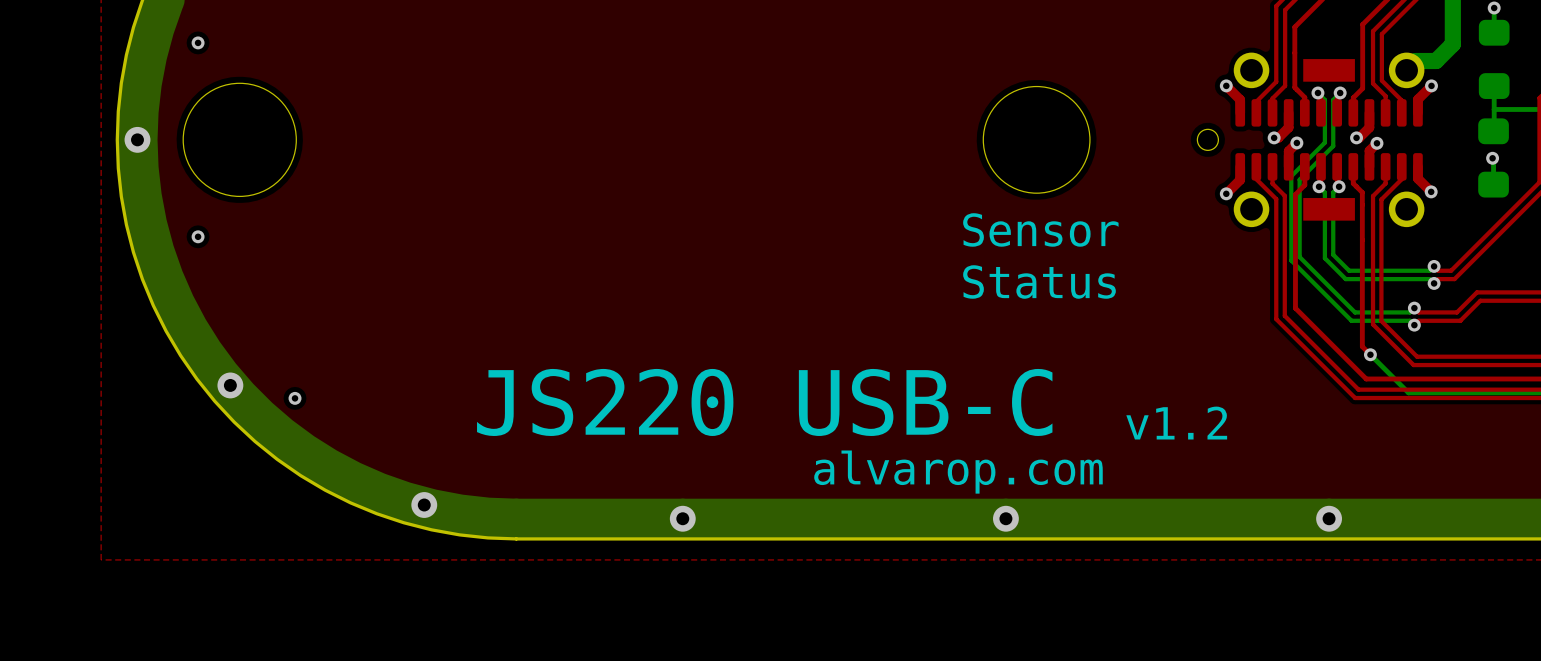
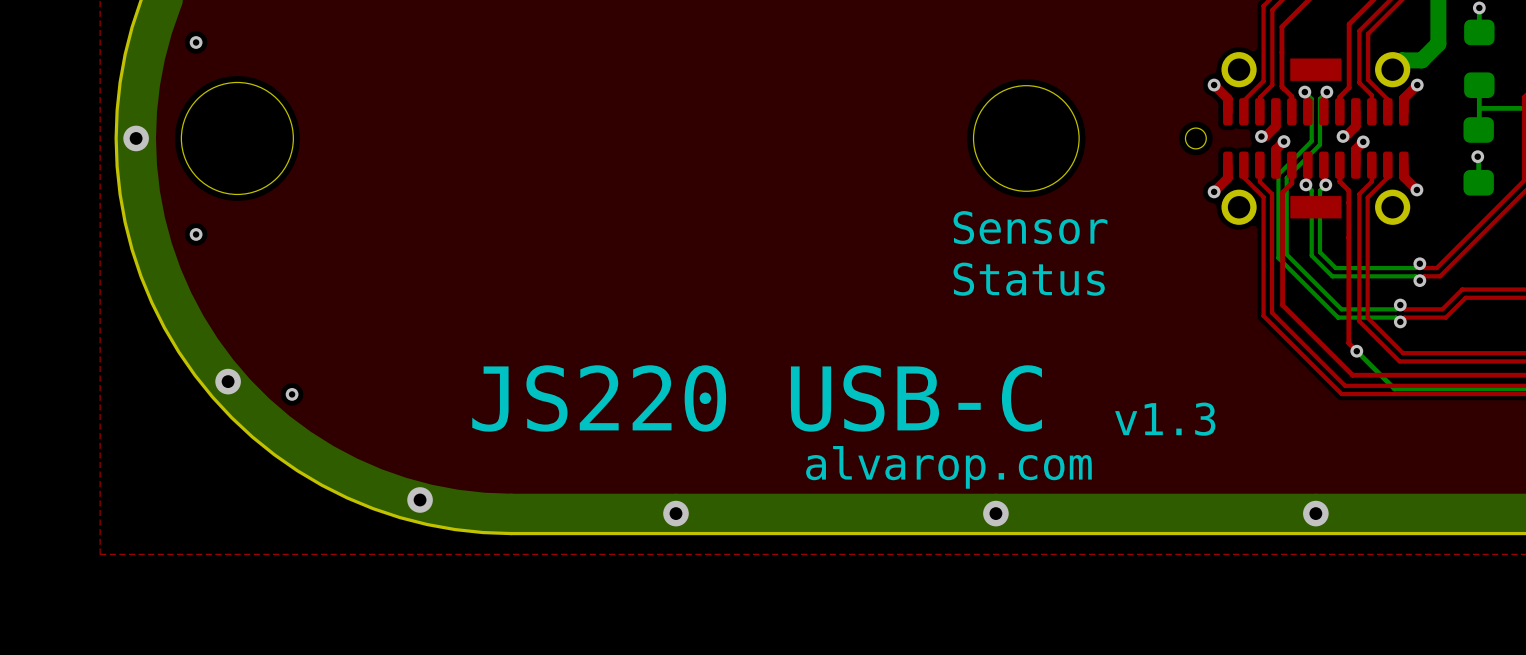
text: v1.2 (1176, 423) -> v1.3 (1165, 419)

